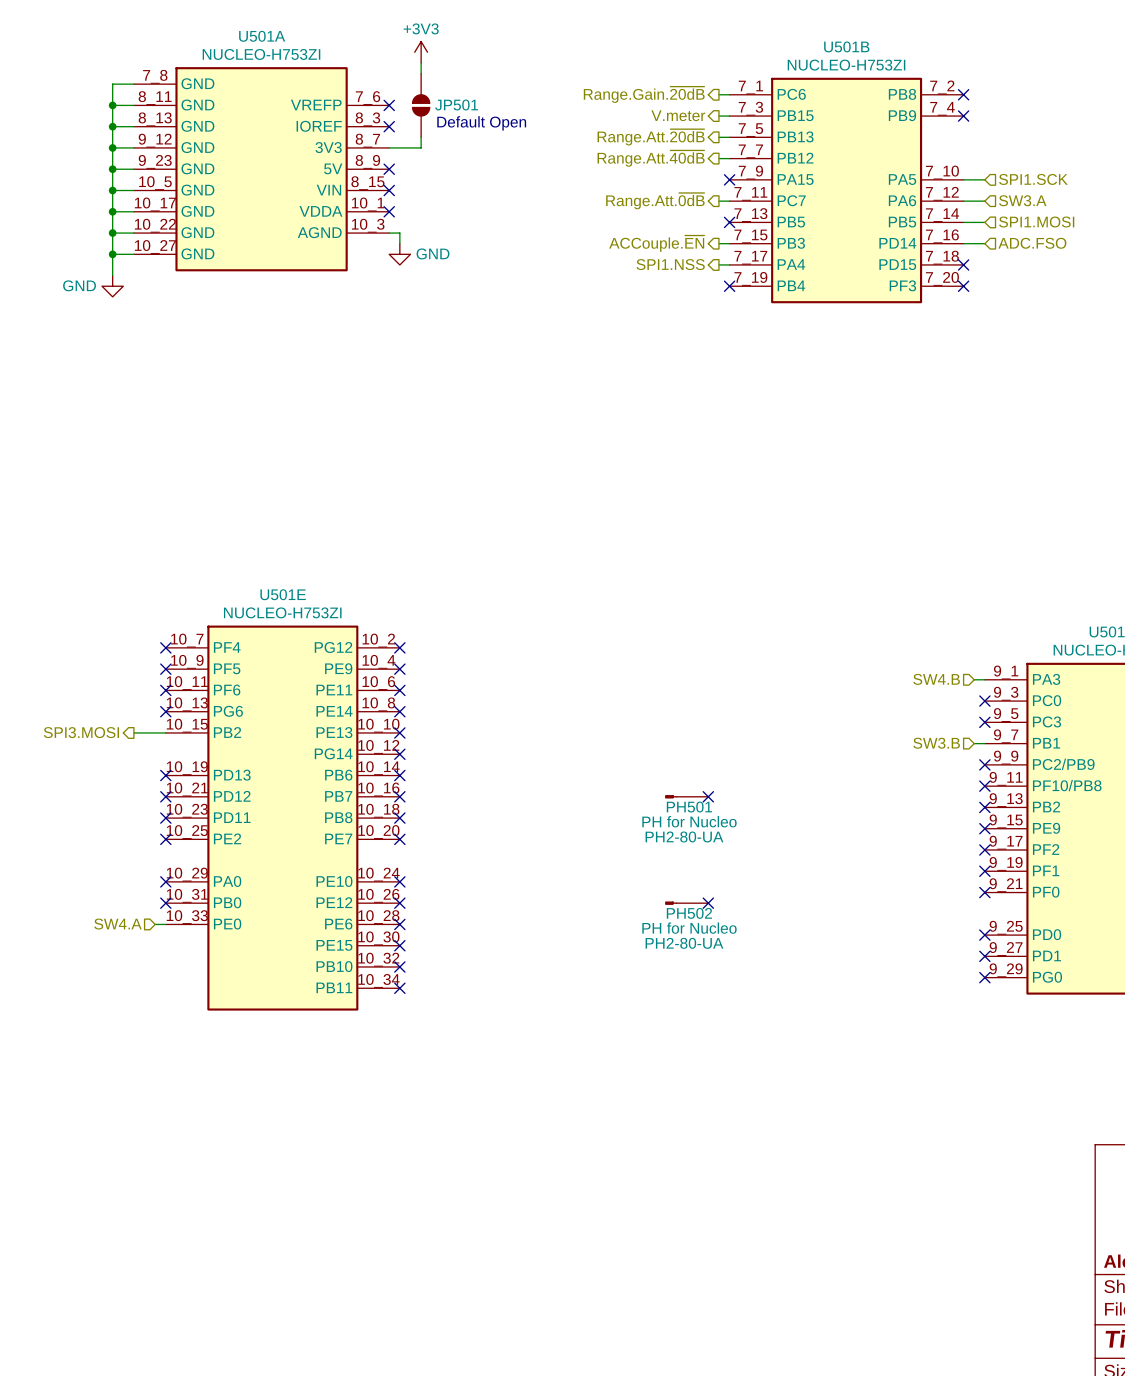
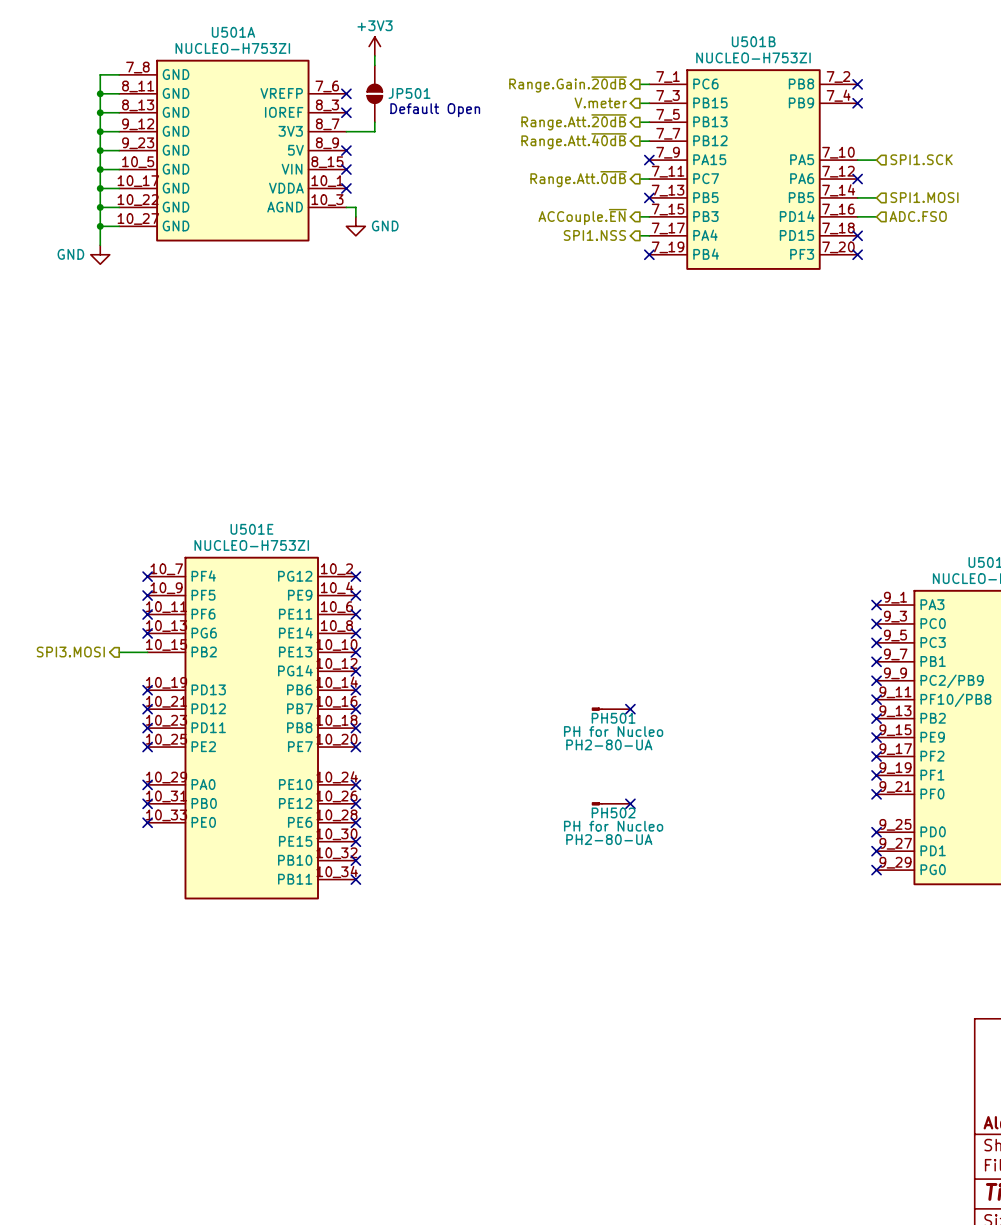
hierarchical label: SW3.A (1022, 200) -> none
wire: (963, 201) (984, 201) -> none
no-connect mark: none -> (857, 179)
hierarchical label: SW4.B (936, 679) -> none
wire: (974, 679) (984, 679) -> none
no-connect mark: none -> (876, 605)
hierarchical label: SW3.B (936, 743) -> none
wire: (974, 743) (984, 743) -> none
no-connect mark: none -> (876, 661)
hierarchical label: SW4.A (117, 924) -> none
wire: (155, 924) (165, 924) -> none
no-connect mark: none -> (147, 822)

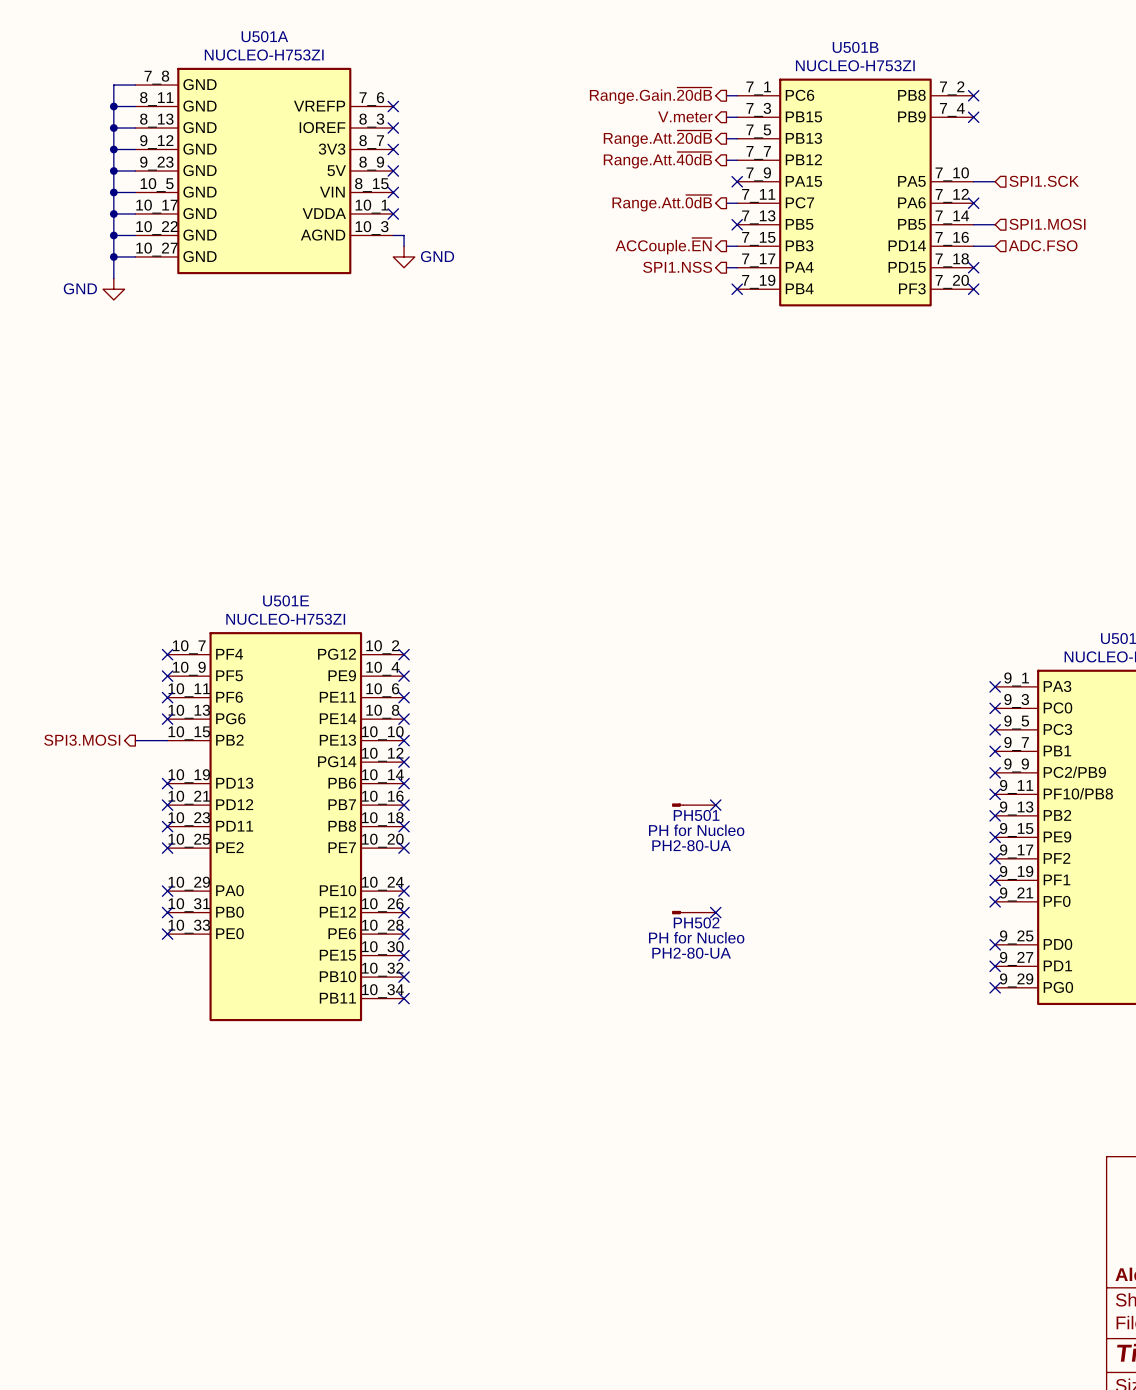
power symbol: +3V3 (374, 46) -> none
wire: (374, 55) (374, 65) -> none
JP501: (374, 93) -> none
text: Default Open (435, 110) -> none
wire: (374, 122) (374, 131) (346, 131) -> none
no-connect mark: none -> (393, 149)

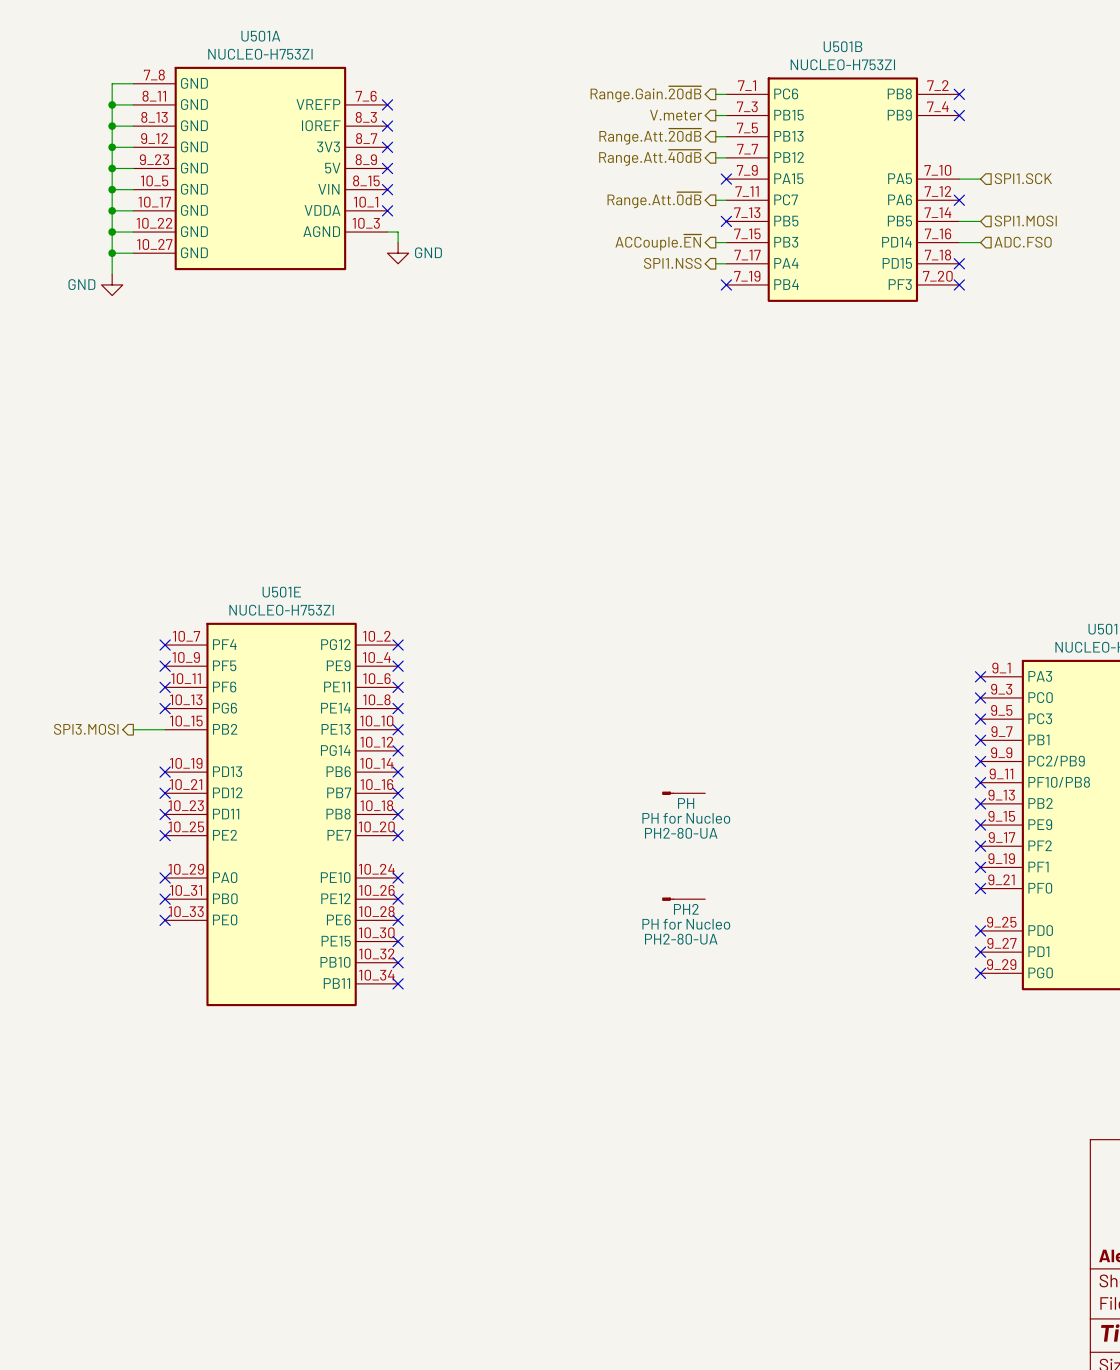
no-connect mark: (715, 805) -> none
PH501 name: PH501 (696, 815) -> PH (686, 803)
no-connect mark: (715, 912) -> none
PH502 name: PH502 (696, 922) -> PH2 (686, 909)

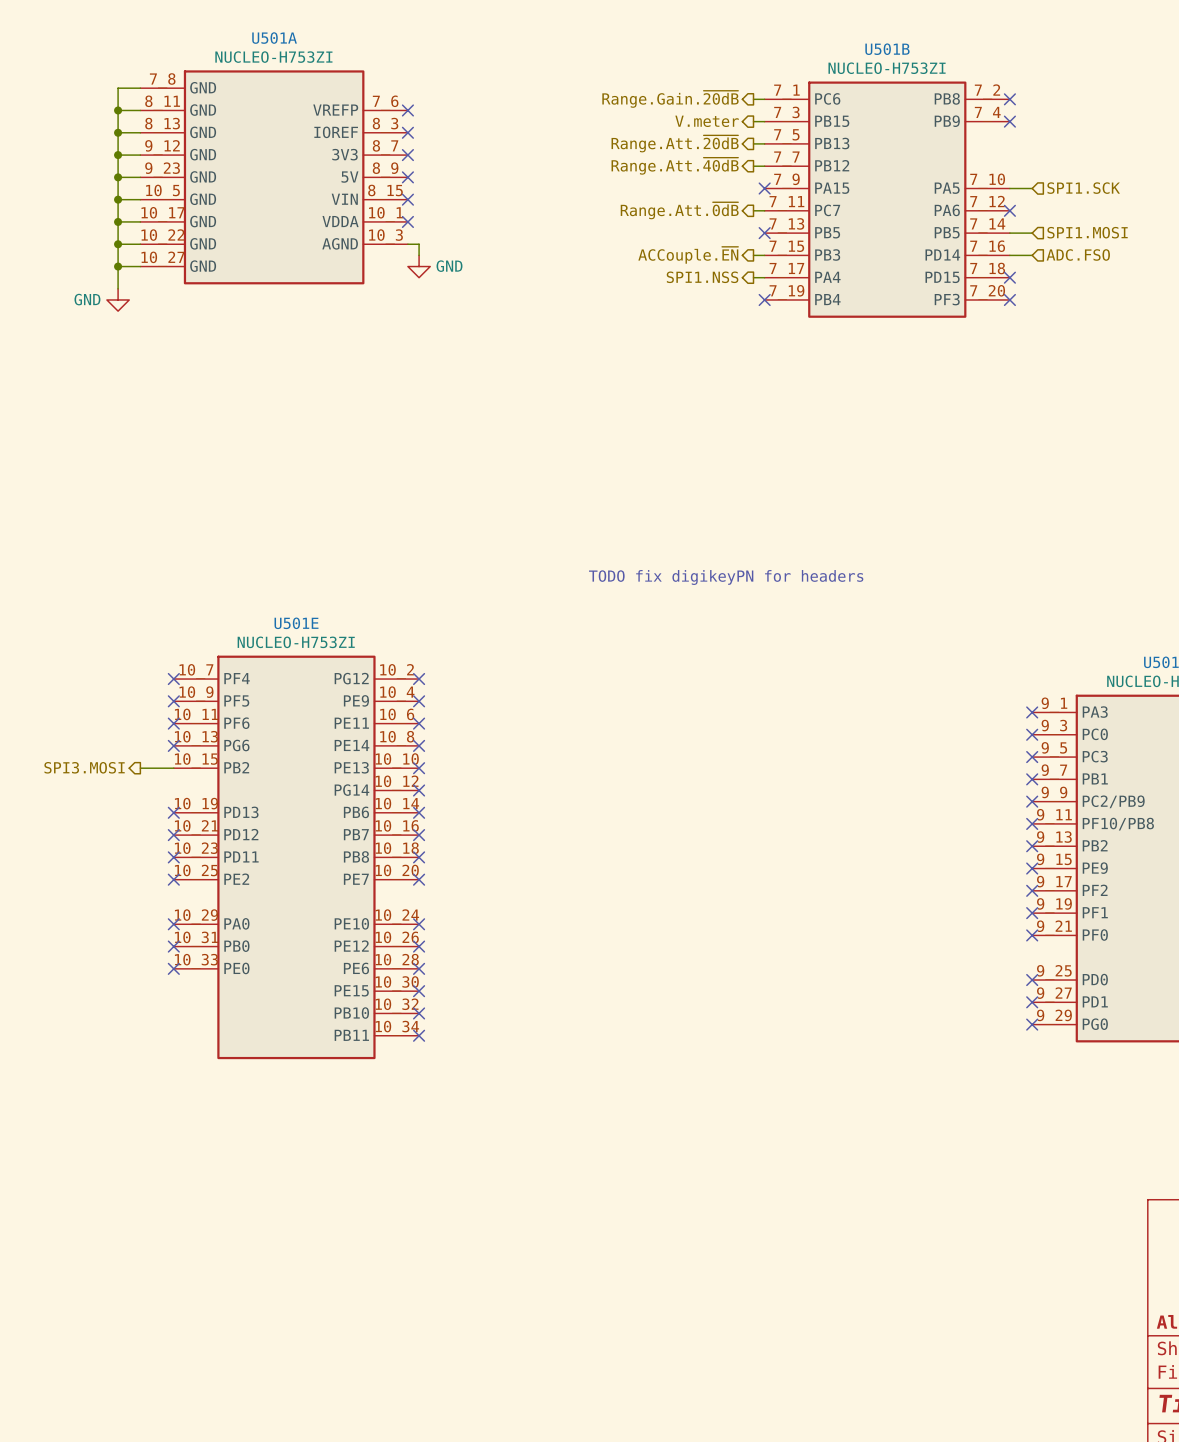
text: none -> TODO fix digikeyPN for headers (726, 577)
PH: PH for Nucleo (683, 793) -> none
PH2: PH for Nucleo (683, 899) -> none

